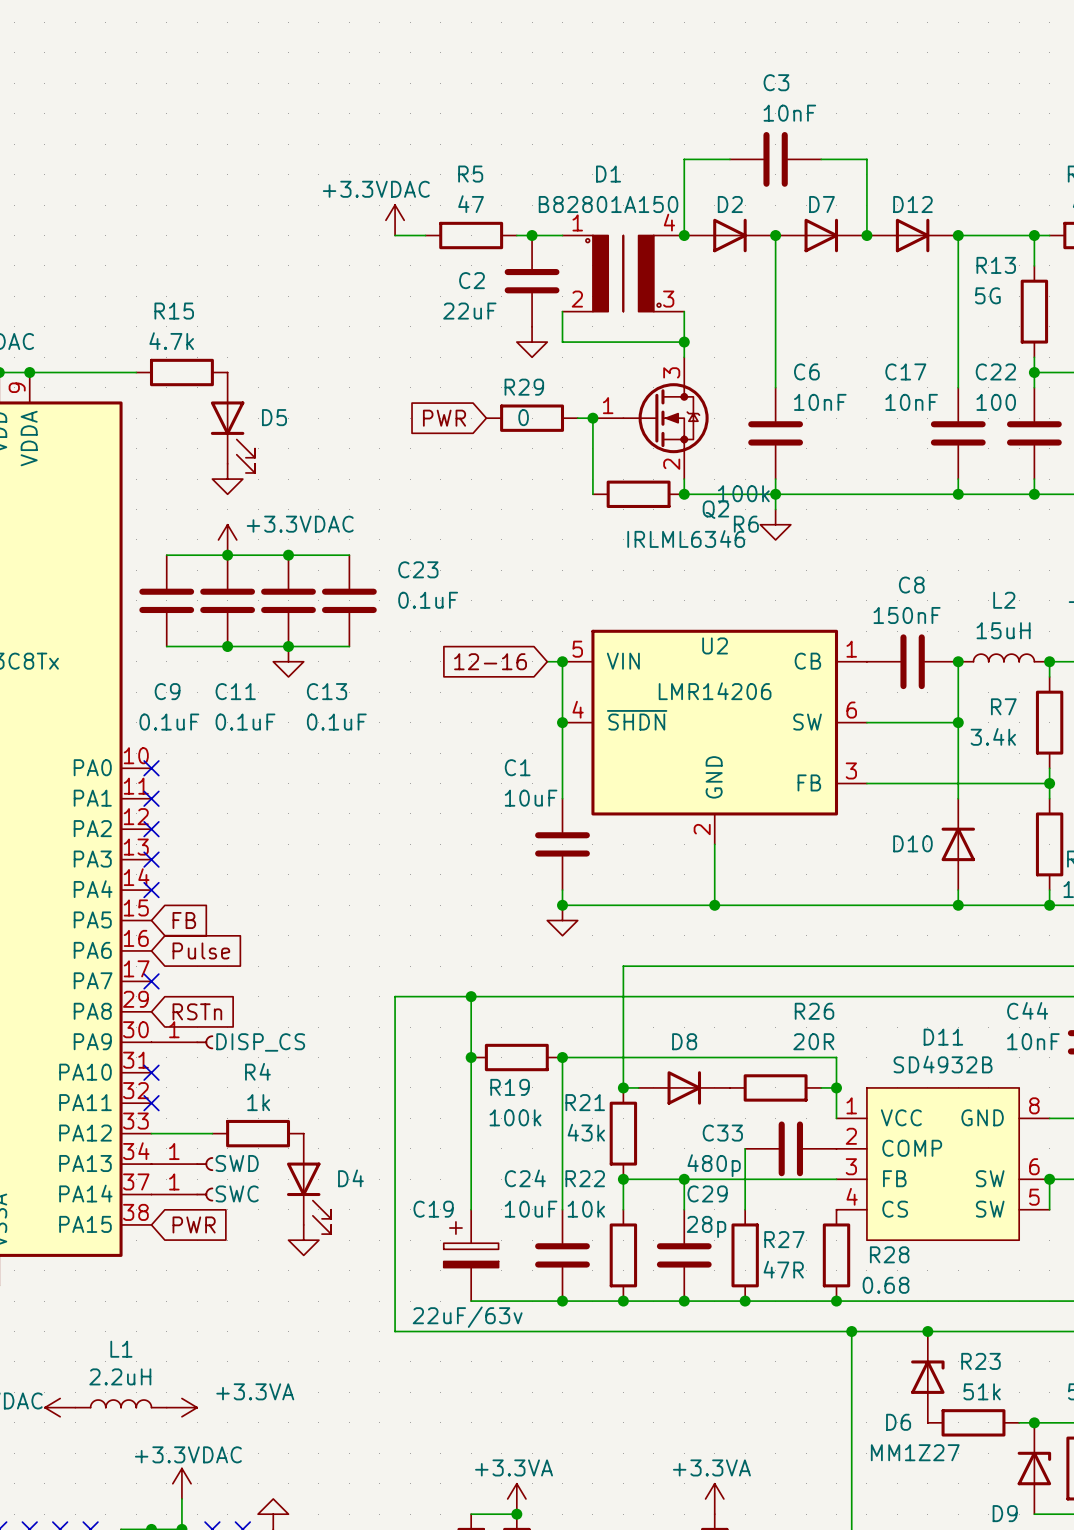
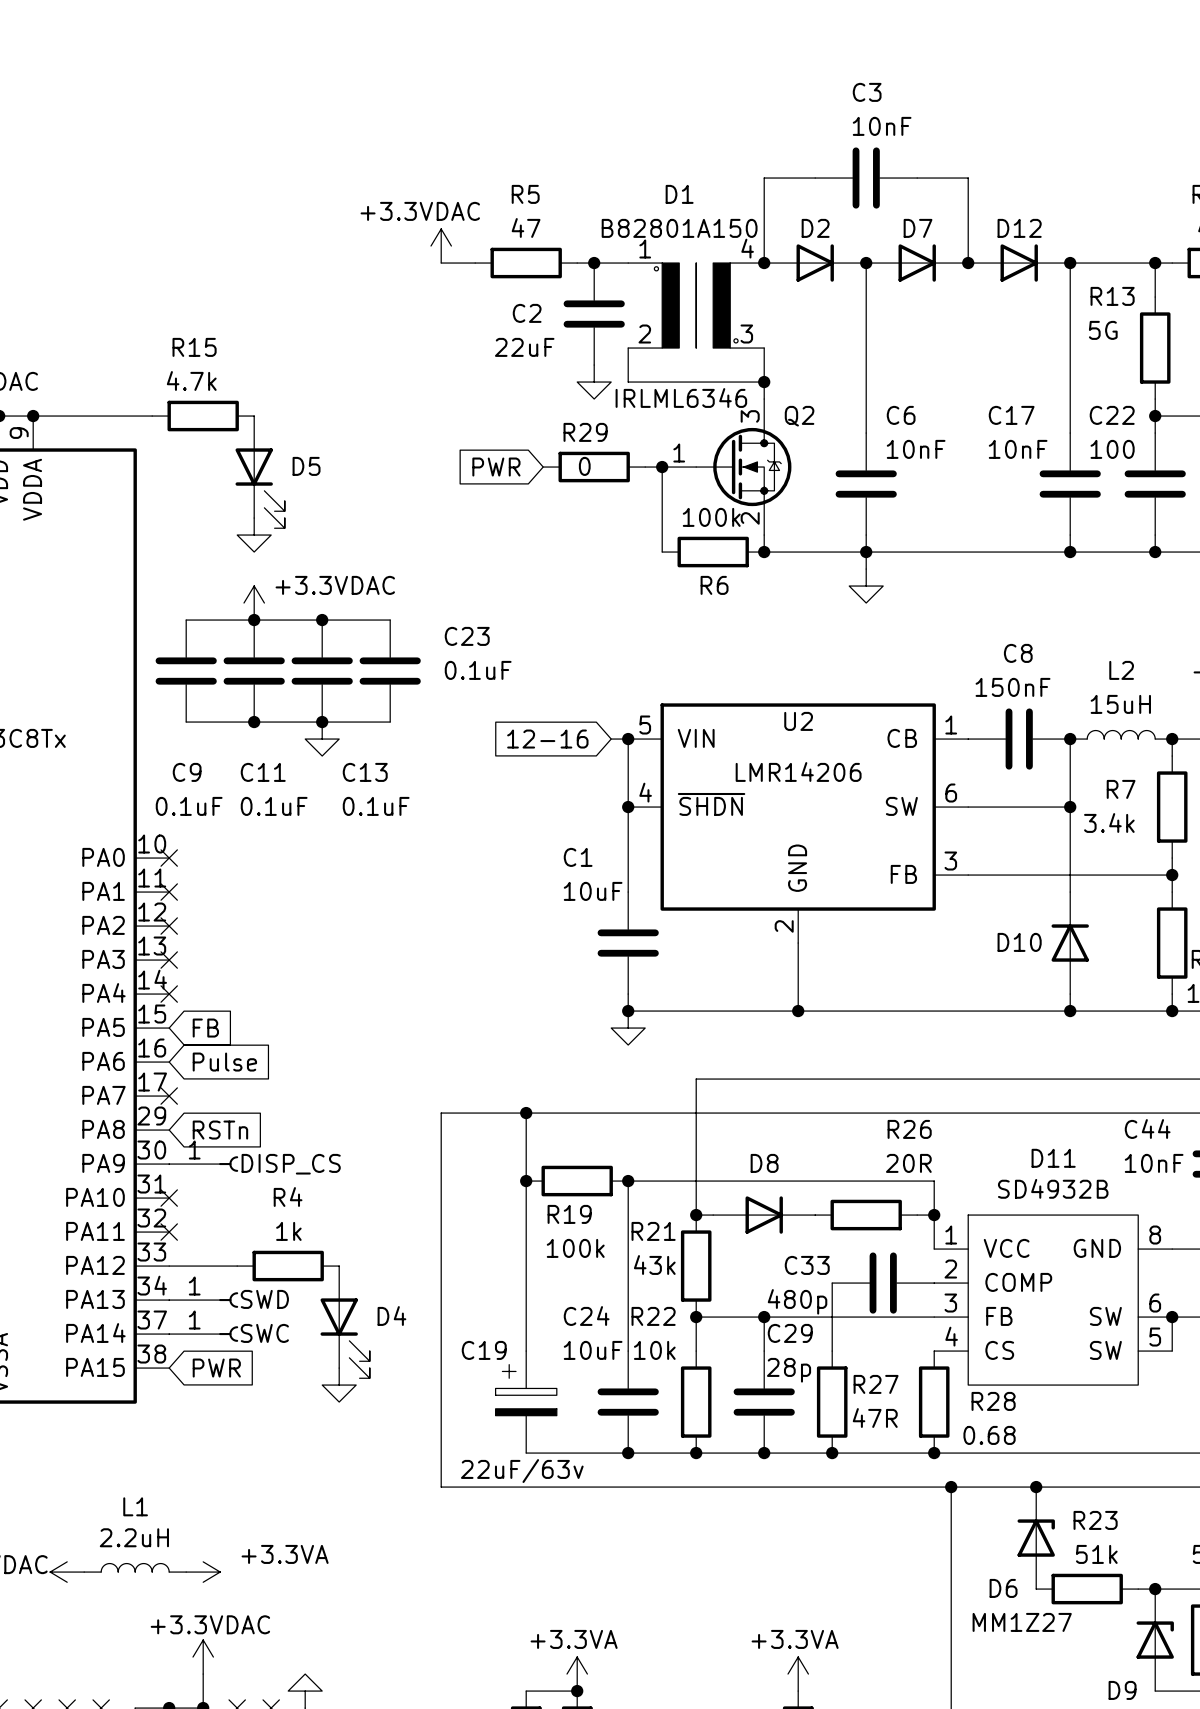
R6 value position: 100k (743, 493) -> 100k (711, 517)
Q2 name position: Q2 (715, 509) -> Q2 (799, 416)
R6 name position: R6 (746, 524) -> R6 (714, 585)
Q2 value position: IRLML6346 (686, 539) -> IRLML6346 (681, 397)

